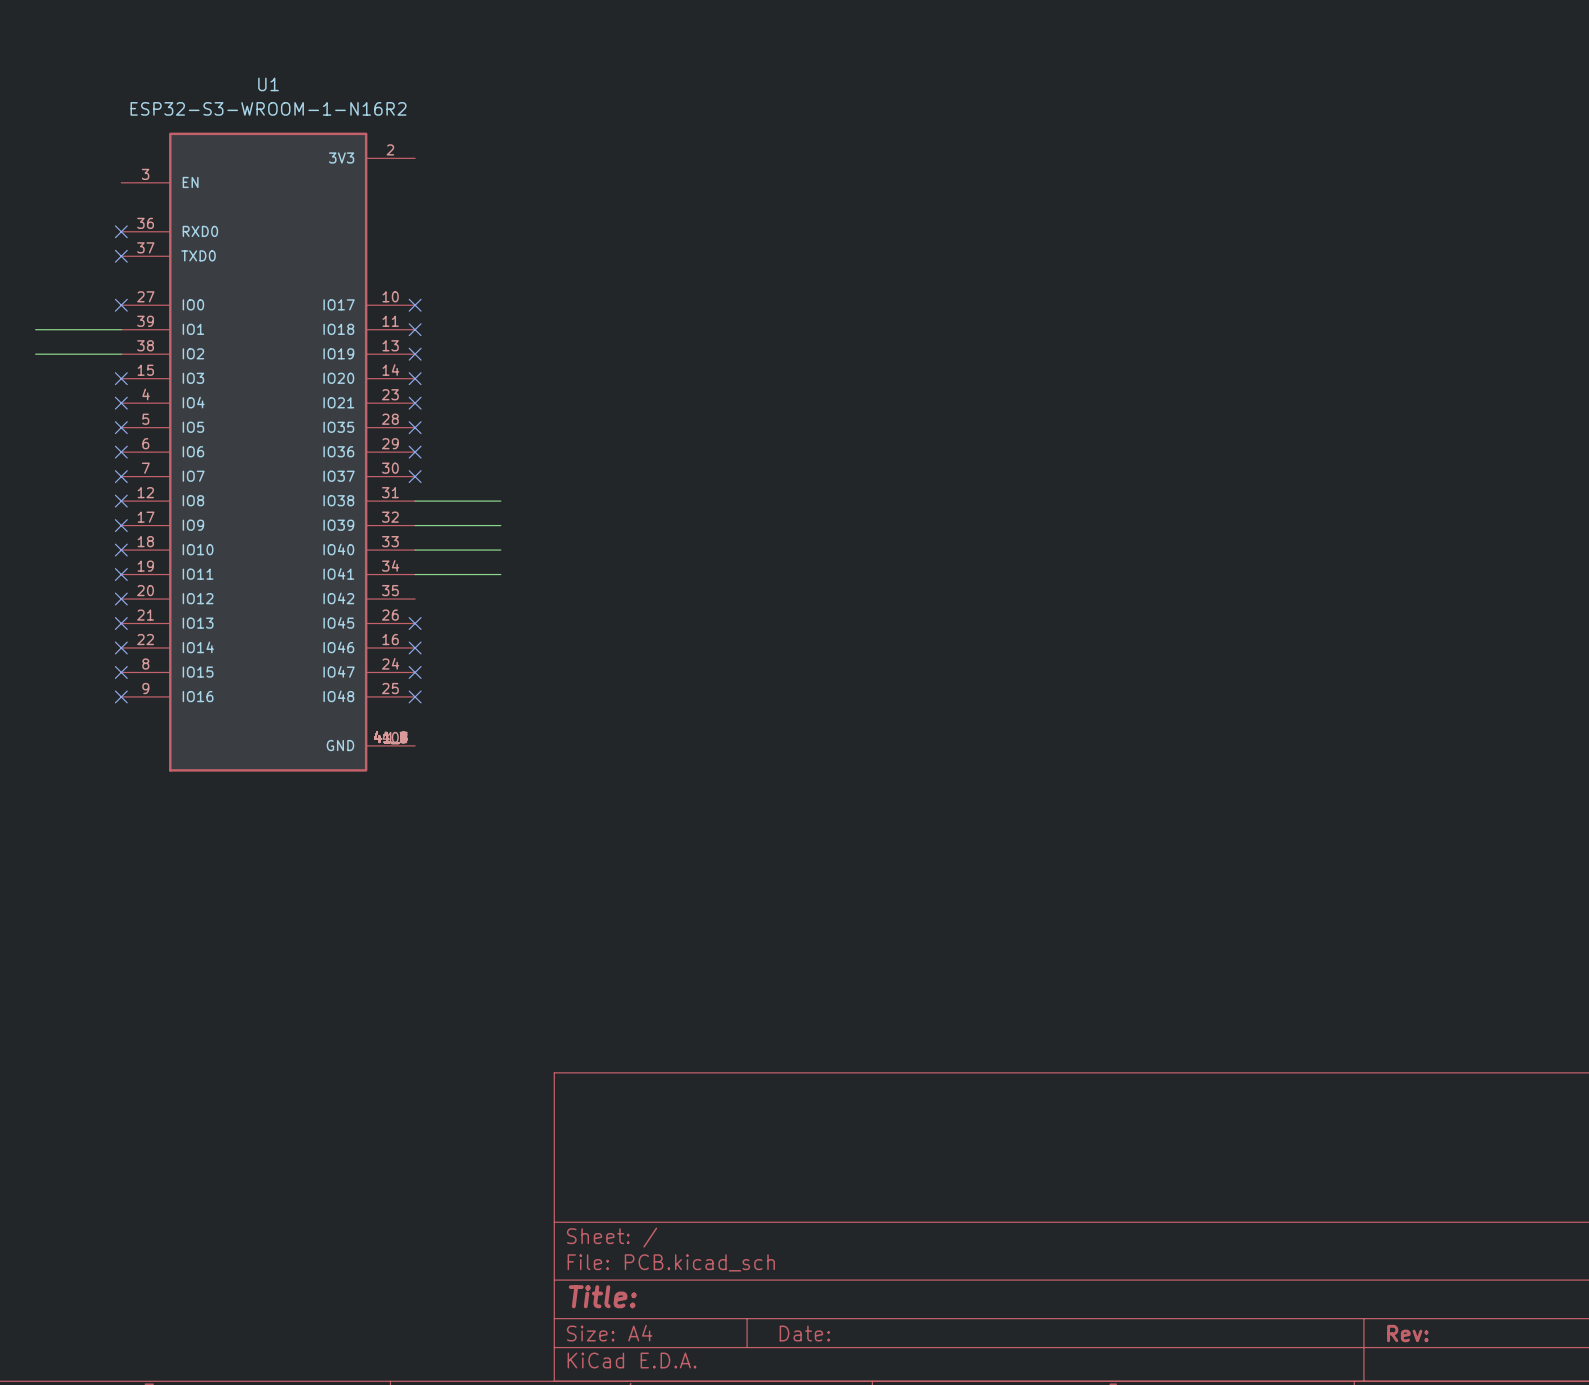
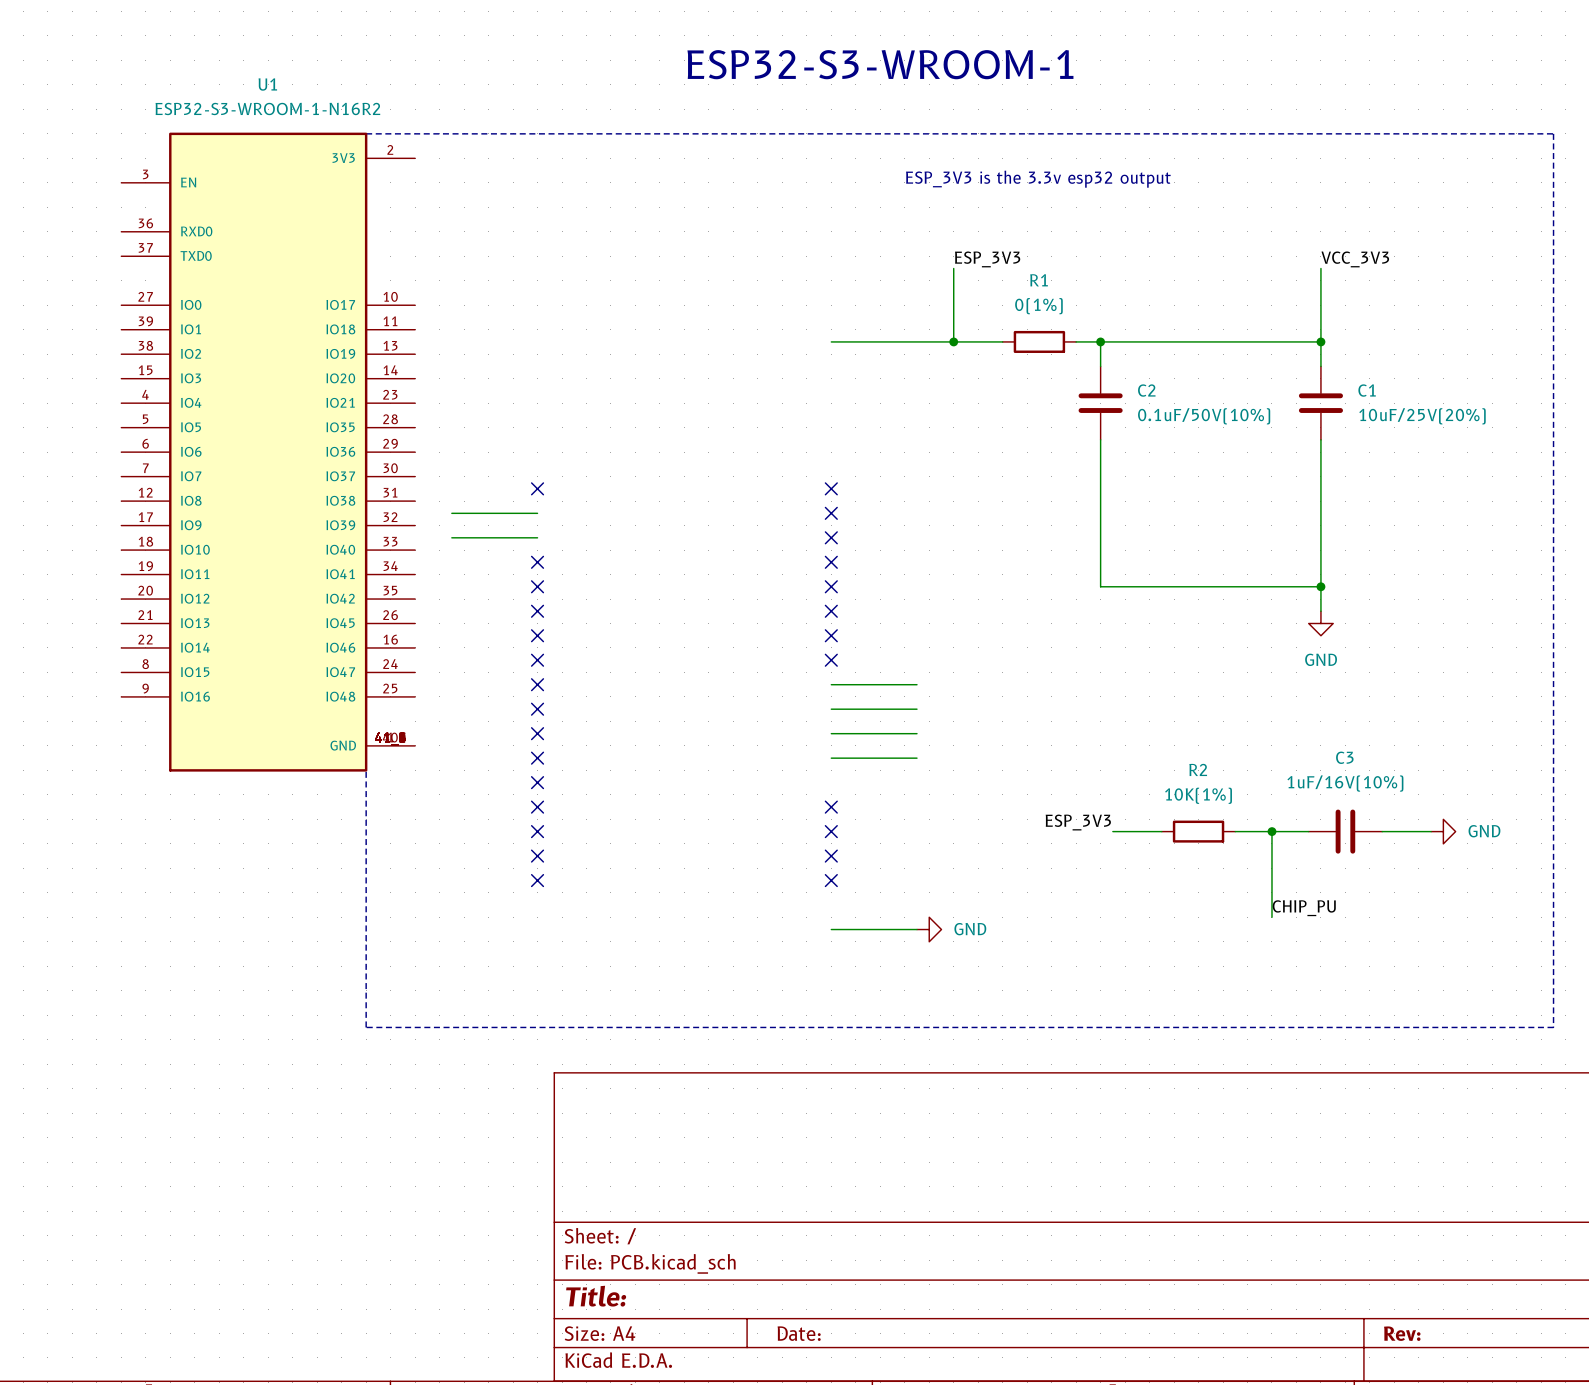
text: none -> ESP32-S3-WROOM-1 (880, 64)
line: none -> (366, 133) (1553, 133) (1553, 1027) (366, 1027) (366, 133)
text: none -> ESP_3V3 is the 3.3v esp32 output (1038, 179)
no-connect mark: (121, 231) -> none
no-connect mark: (121, 256) -> none
label: none -> ESP_3V3 (987, 259)
label: none -> VCC_3V3 (1355, 259)
wire: none -> (953, 268) (953, 341)
wire: none -> (1320, 268) (1320, 366)
no-connect mark: (121, 305) -> none
no-connect mark: (415, 305) -> none
wire: (35, 329) (121, 329) -> none
no-connect mark: (415, 329) -> none
wire: none -> (831, 341) (1002, 341)
junction: none -> (953, 341)
R1: none -> 0(1%) (1039, 341)
wire: none -> (1076, 341) (1320, 341)
wire: none -> (1100, 341) (1100, 366)
junction: none -> (1100, 341)
junction: none -> (1320, 341)
wire: (35, 354) (121, 354) -> none
no-connect mark: (415, 354) -> none
no-connect mark: (121, 378) -> none
no-connect mark: (415, 378) -> none
no-connect mark: (121, 403) -> none
no-connect mark: (415, 403) -> none
C2: none -> 0.1uF/50V(10%) (1100, 403)
C1: none -> 10uF/25V(20%) (1320, 403)
no-connect mark: (121, 427) -> none
no-connect mark: (415, 427) -> none
wire: none -> (1100, 439) (1100, 586) (1320, 586)
wire: none -> (1320, 439) (1320, 611)
no-connect mark: (121, 452) -> none
no-connect mark: (415, 452) -> none
no-connect mark: (121, 476) -> none
no-connect mark: (415, 476) -> none
no-connect mark: none -> (537, 488)
no-connect mark: none -> (831, 488)
no-connect mark: (121, 501) -> none
wire: (415, 501) (500, 501) -> (451, 513) (537, 513)
no-connect mark: none -> (831, 513)
no-connect mark: (121, 525) -> none
wire: (415, 525) (500, 525) -> (451, 537) (537, 537)
no-connect mark: none -> (831, 537)
no-connect mark: (121, 550) -> none
wire: (415, 550) (500, 550) -> none
no-connect mark: none -> (537, 562)
no-connect mark: none -> (831, 562)
no-connect mark: (121, 574) -> none
wire: (415, 574) (500, 574) -> none
no-connect mark: none -> (537, 586)
no-connect mark: none -> (831, 586)
junction: none -> (1320, 586)
no-connect mark: (121, 599) -> none
no-connect mark: none -> (537, 611)
no-connect mark: none -> (831, 611)
no-connect mark: (121, 623) -> none
no-connect mark: (415, 623) -> none
power symbol: none -> GND (1320, 623)
no-connect mark: none -> (537, 635)
no-connect mark: none -> (831, 635)
no-connect mark: (121, 647) -> none
no-connect mark: (415, 647) -> none
no-connect mark: none -> (537, 660)
no-connect mark: none -> (831, 660)
no-connect mark: (121, 672) -> none
no-connect mark: (415, 672) -> none
no-connect mark: none -> (537, 684)
wire: none -> (831, 684) (917, 684)
no-connect mark: (121, 696) -> none
no-connect mark: (415, 696) -> none
no-connect mark: none -> (537, 709)
wire: none -> (831, 709) (917, 709)
no-connect mark: none -> (537, 733)
wire: none -> (831, 733) (917, 733)
no-connect mark: none -> (537, 758)
wire: none -> (831, 758) (917, 758)
no-connect mark: none -> (537, 782)
no-connect mark: none -> (537, 807)
no-connect mark: none -> (831, 807)
label: none -> ESP_3V3 (1078, 822)
no-connect mark: none -> (537, 831)
no-connect mark: none -> (831, 831)
wire: none -> (1112, 831) (1161, 831)
R2: none -> 10K(1%) (1198, 831)
wire: none -> (1235, 831) (1308, 831)
wire: none -> (1271, 831) (1271, 917)
junction: none -> (1271, 831)
C3: none -> 1uF/16V(10%) (1345, 831)
wire: none -> (1382, 831) (1431, 831)
power symbol: none -> GND (1443, 831)
no-connect mark: none -> (537, 856)
no-connect mark: none -> (831, 856)
no-connect mark: none -> (537, 880)
no-connect mark: none -> (831, 880)
label: none -> CHIP_PU (1304, 908)
wire: none -> (831, 929) (917, 929)
power symbol: none -> GND (929, 929)

